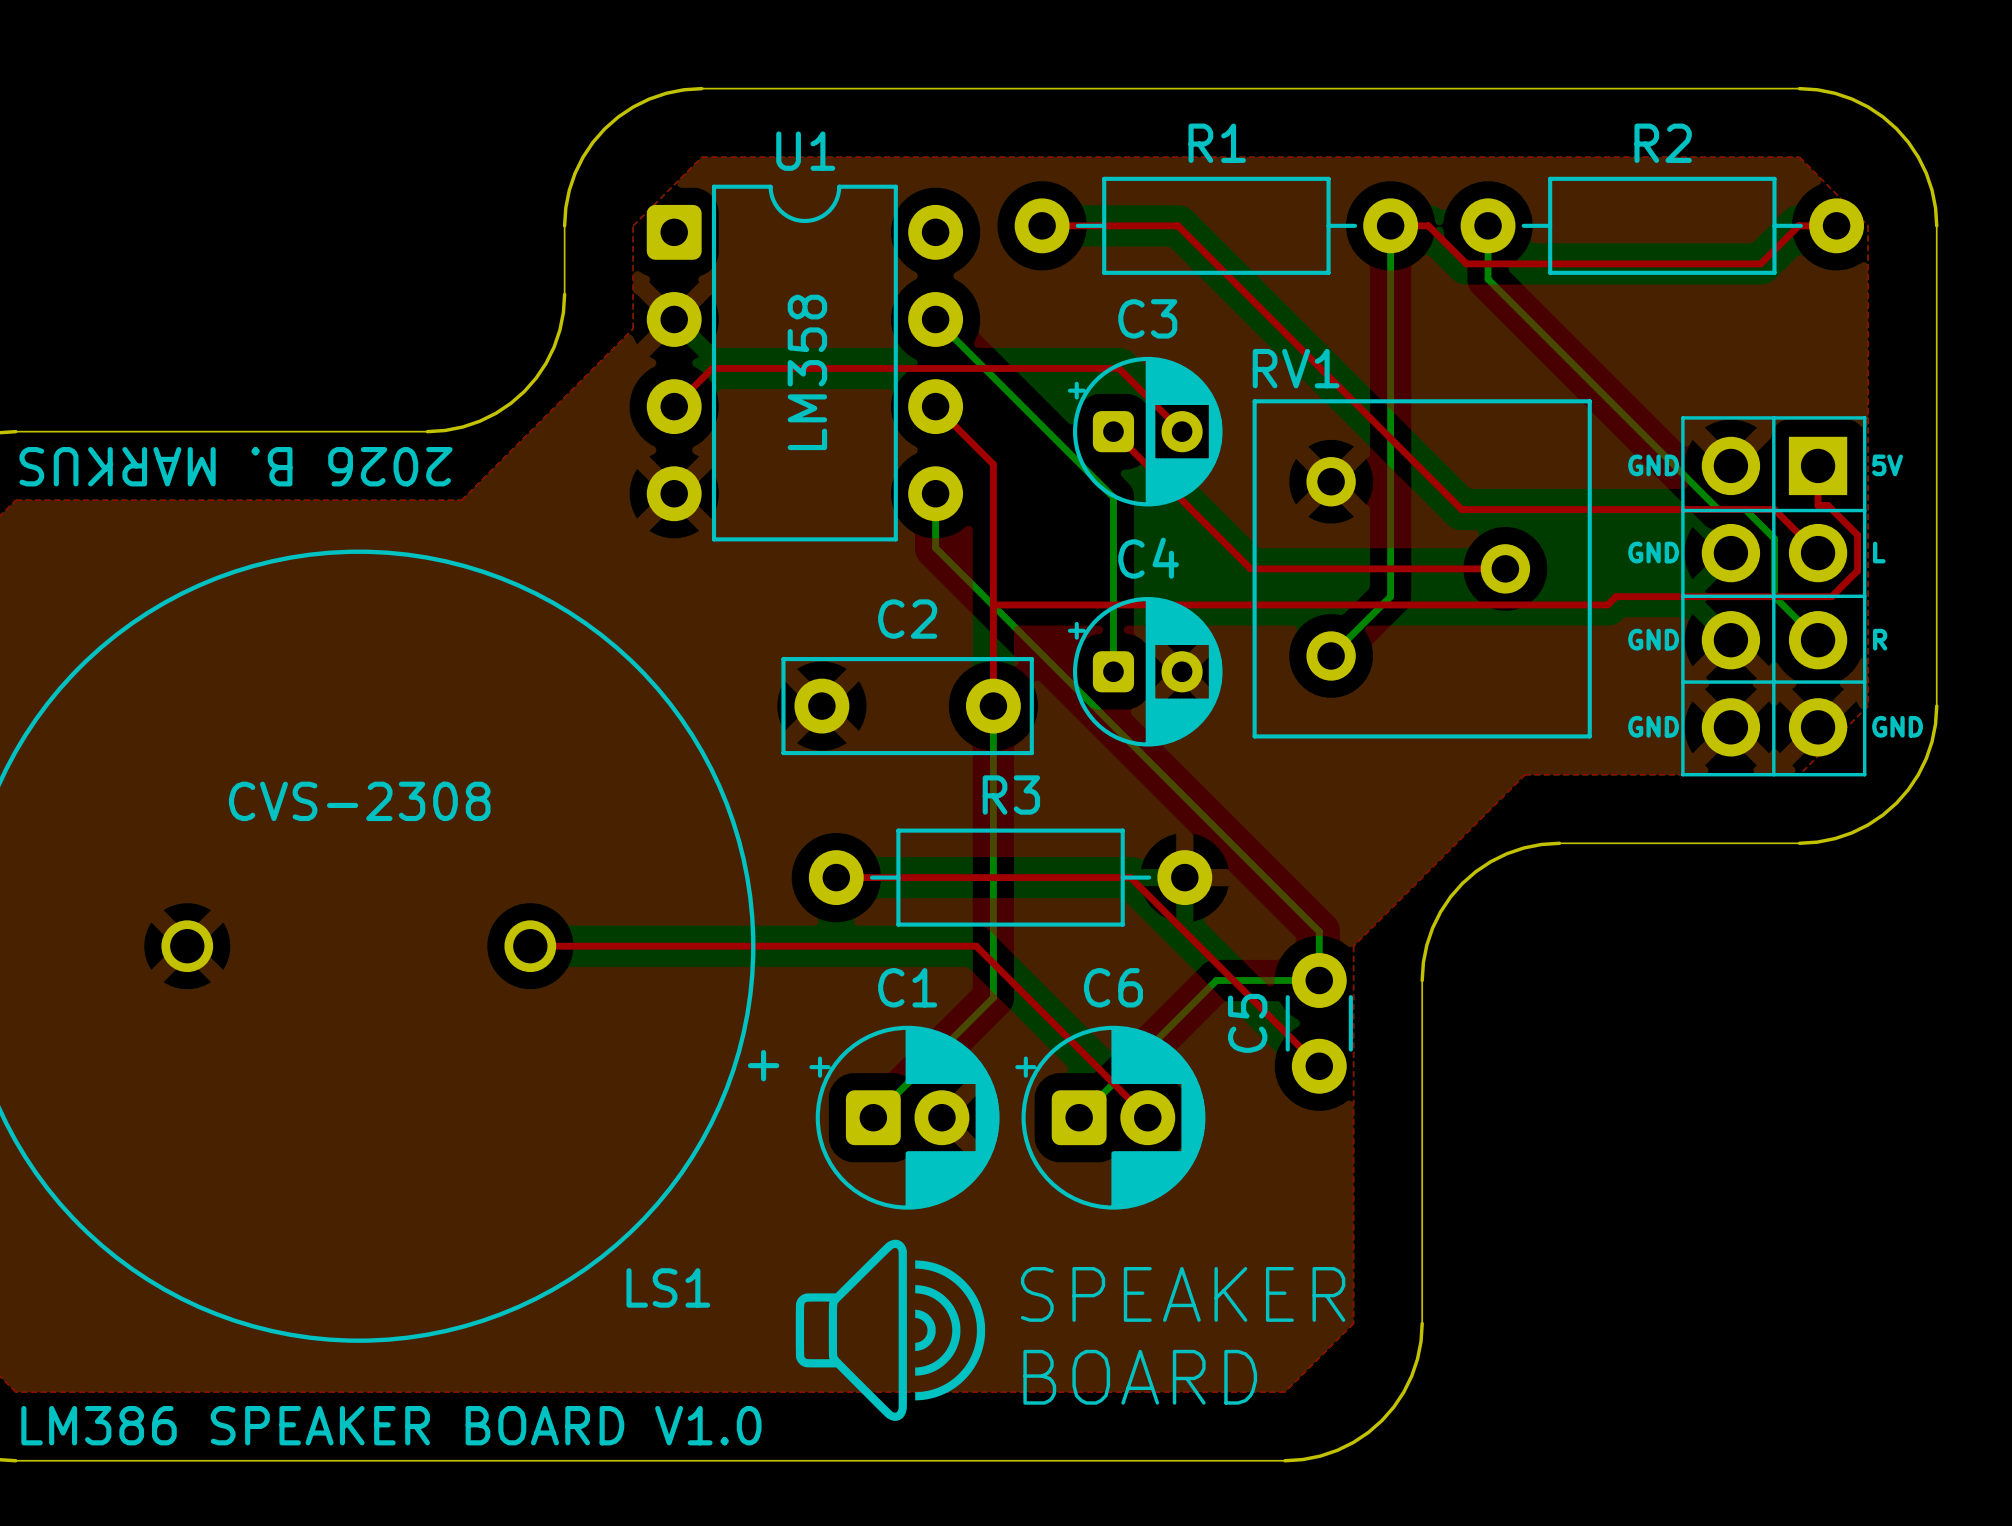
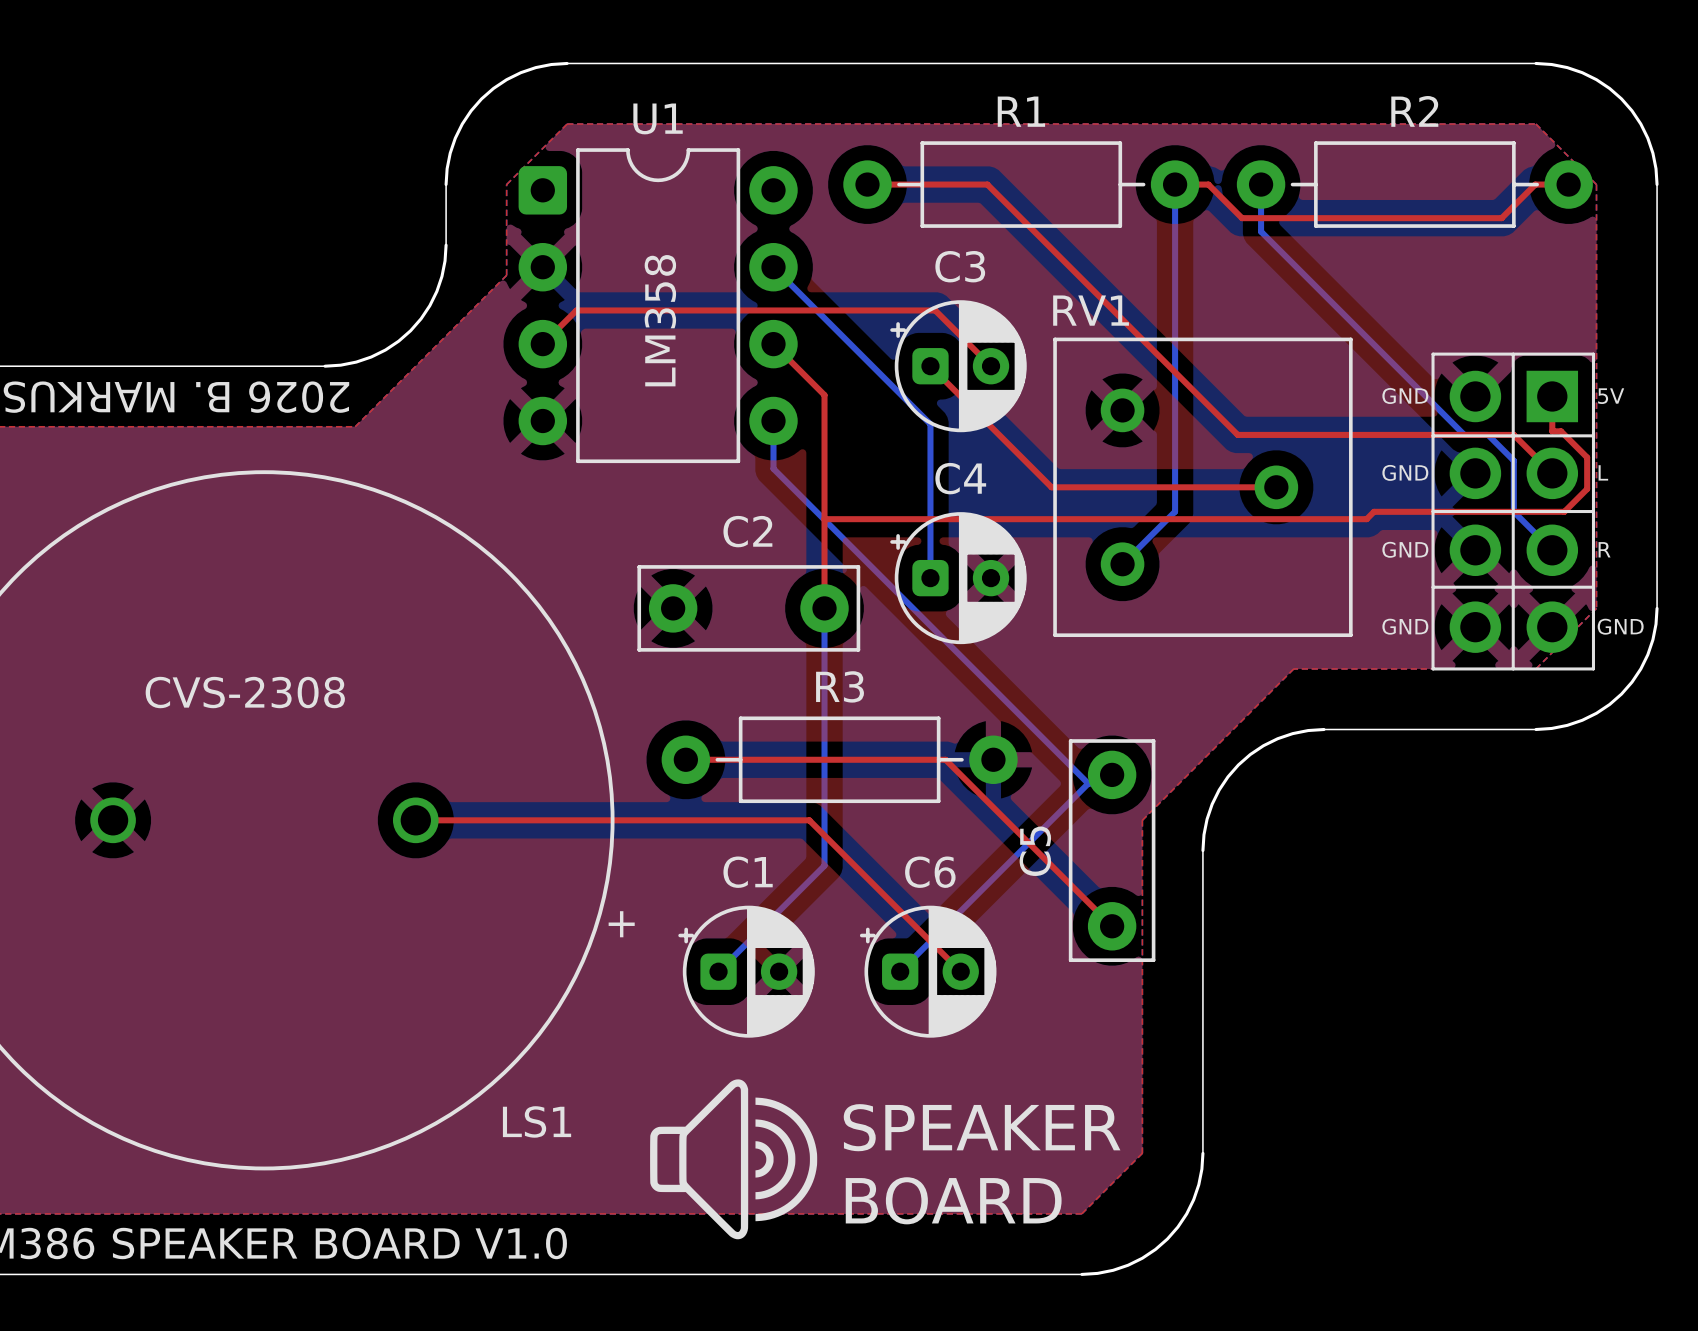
bottom track: (1292, 904) (1319, 931) (1319, 980) (1216, 980) -> (1112, 774) (1103, 783) (1088, 783) (1021, 850)
C5 footprint: [1285, 953, 1353, 1094] -> [1068, 739, 1156, 963]
C1 footprint: [809, 1025, 1000, 1210] -> [678, 905, 815, 1038]
C6 footprint: [1015, 1025, 1206, 1210] -> [859, 905, 997, 1038]

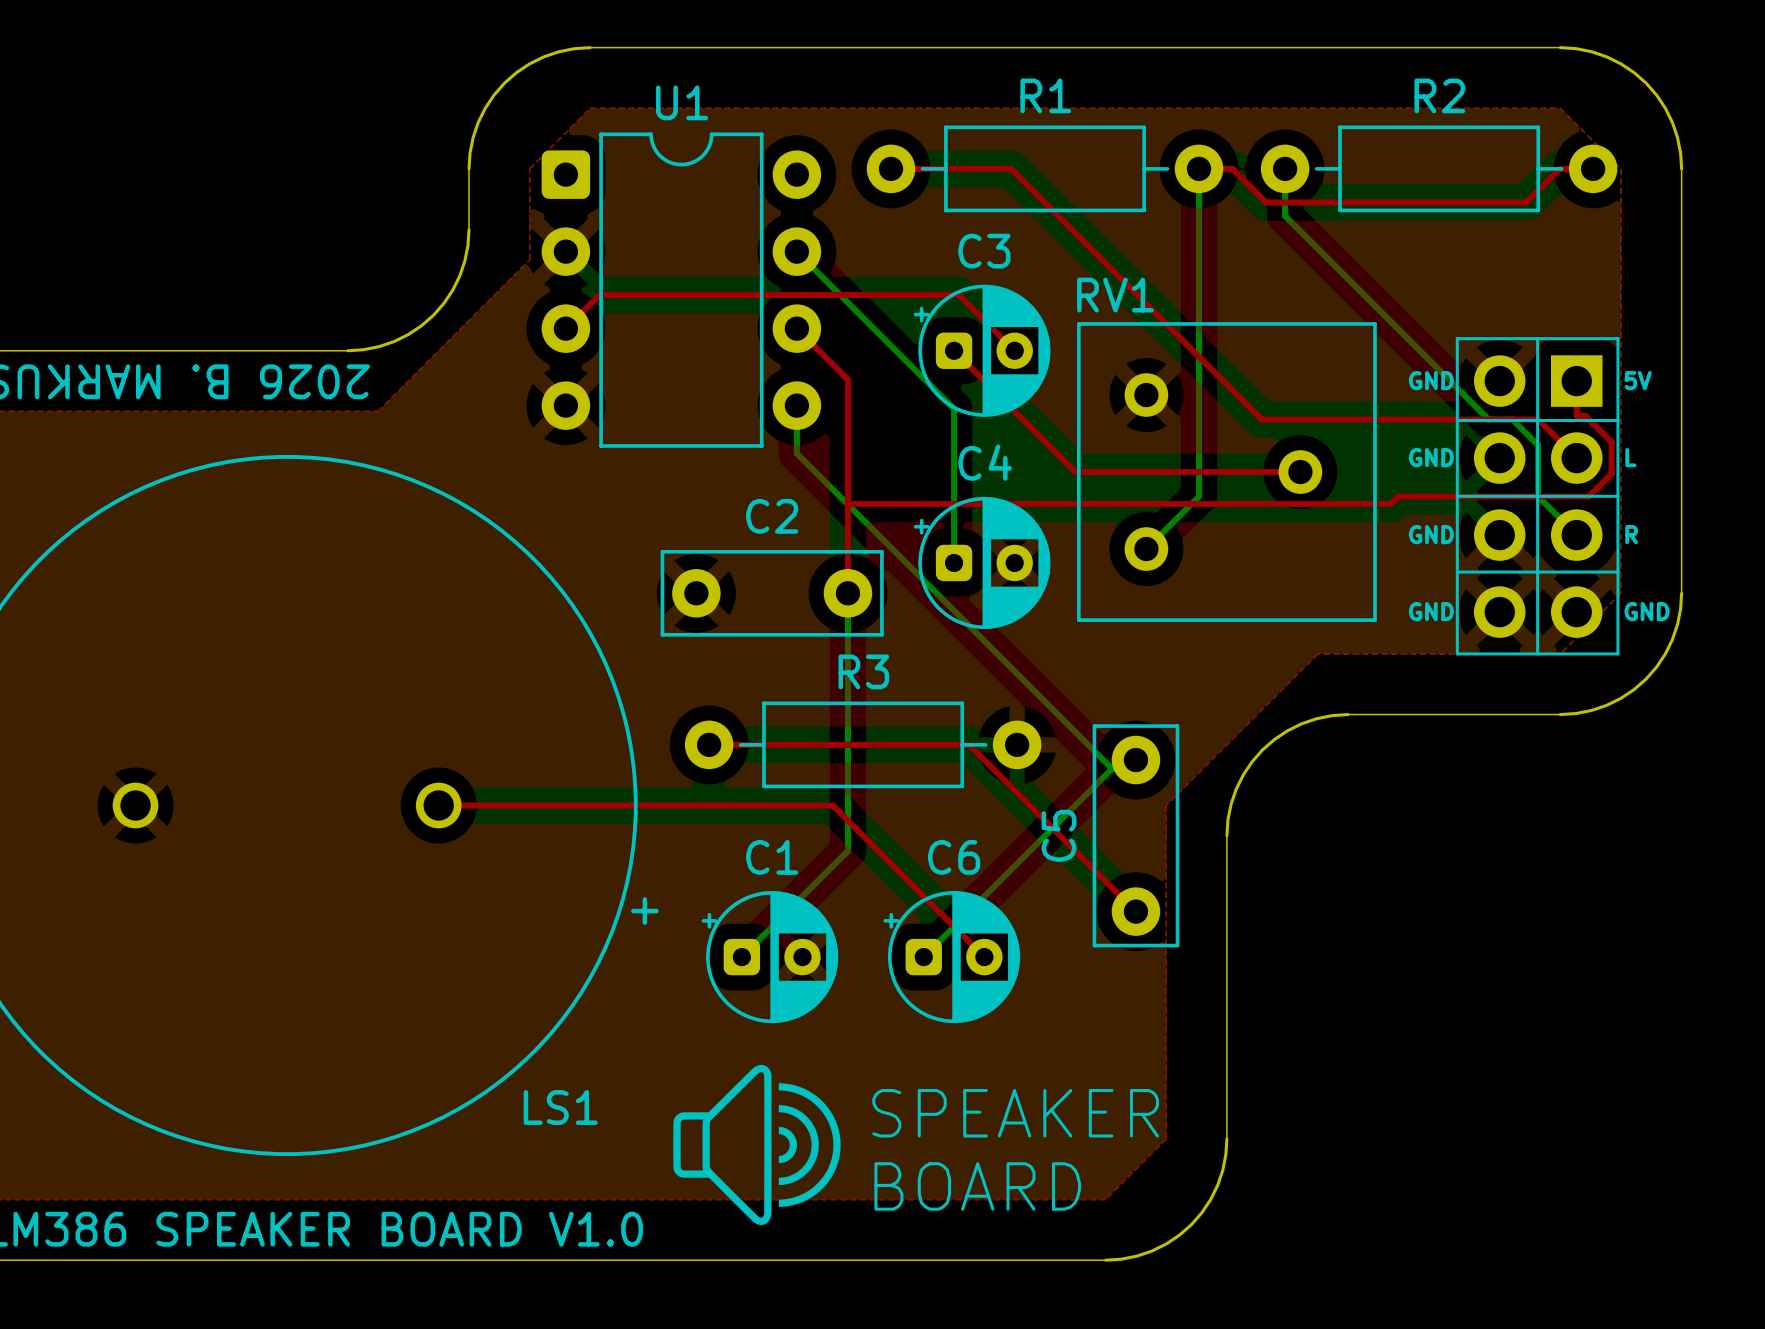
text: LM358 (660, 320) -> none
text: CVS-2308 (245, 692) -> none

